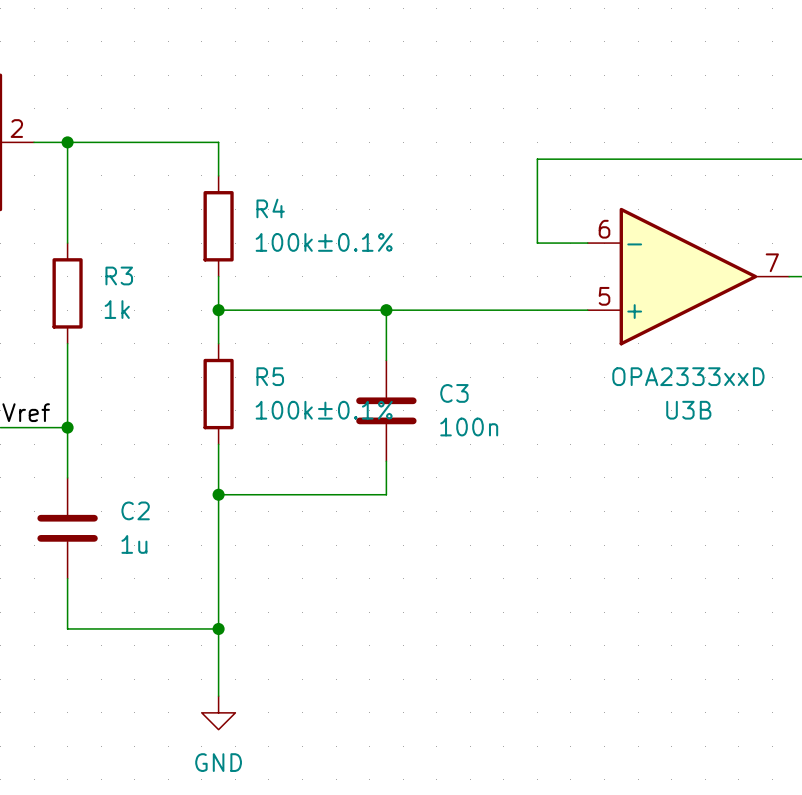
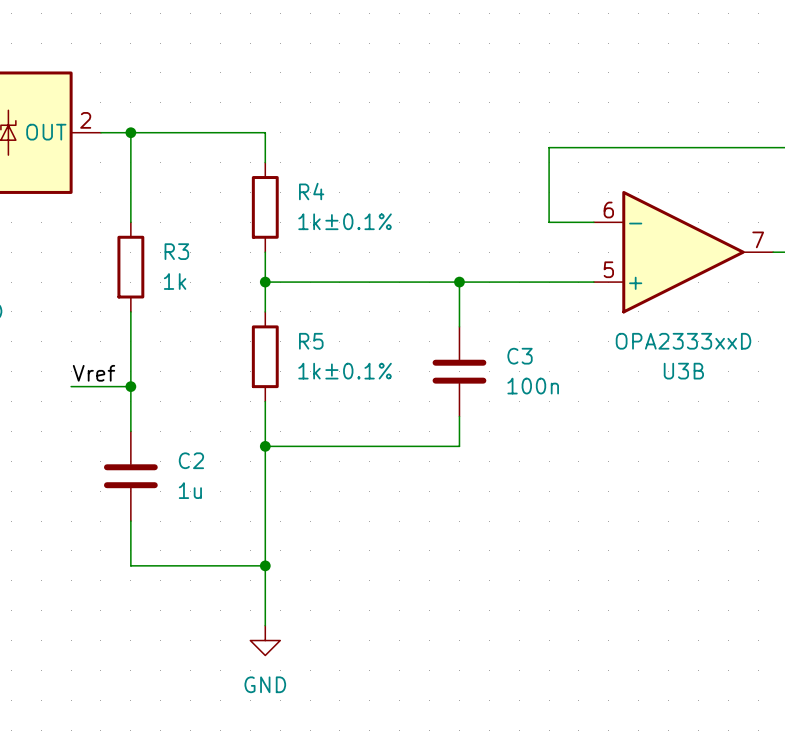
R4 value: 100k±0.1% (324, 242) -> 1k±0.1% (345, 221)
wire: (386, 310) (386, 360) -> (459, 282) (459, 326)
junction position: (386, 310) -> (459, 282)
R5 value: 100k±0.1% (324, 410) -> 1k±0.1% (345, 371)
C3 position: (386, 410) -> (459, 371)
wire: (386, 461) (386, 494) -> (459, 416) (459, 446) (414, 446)

